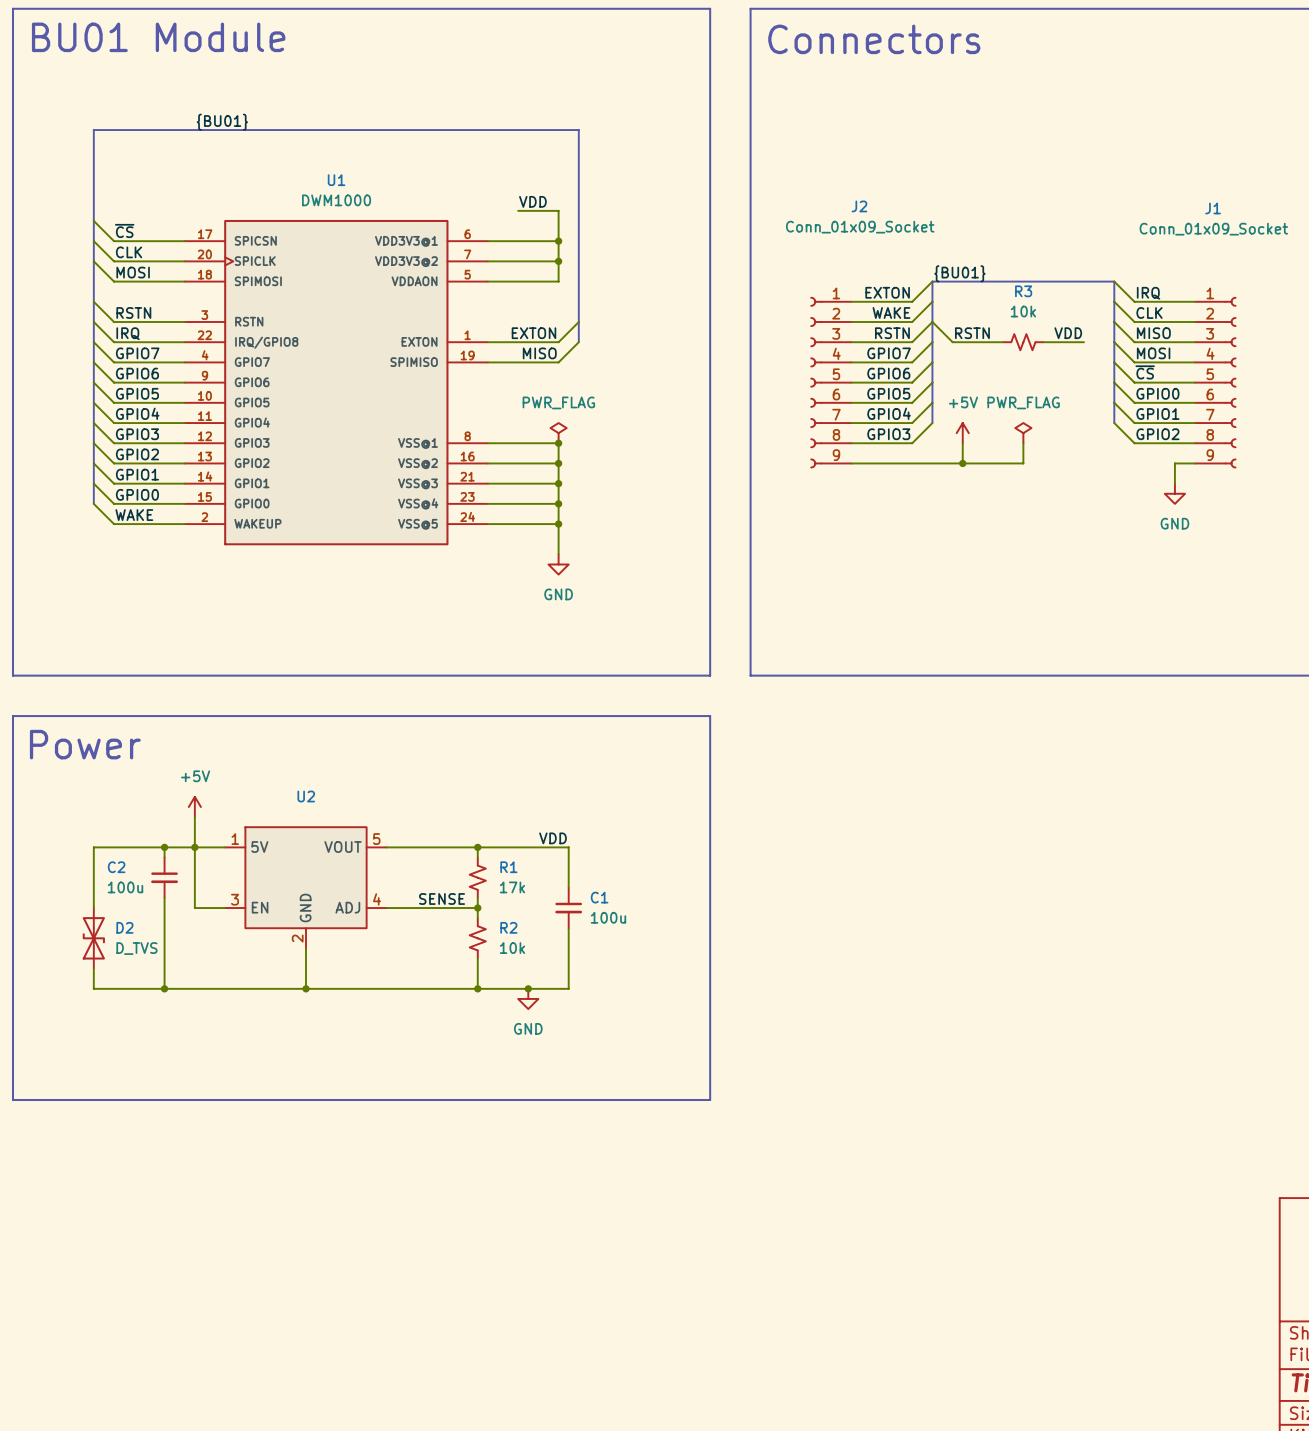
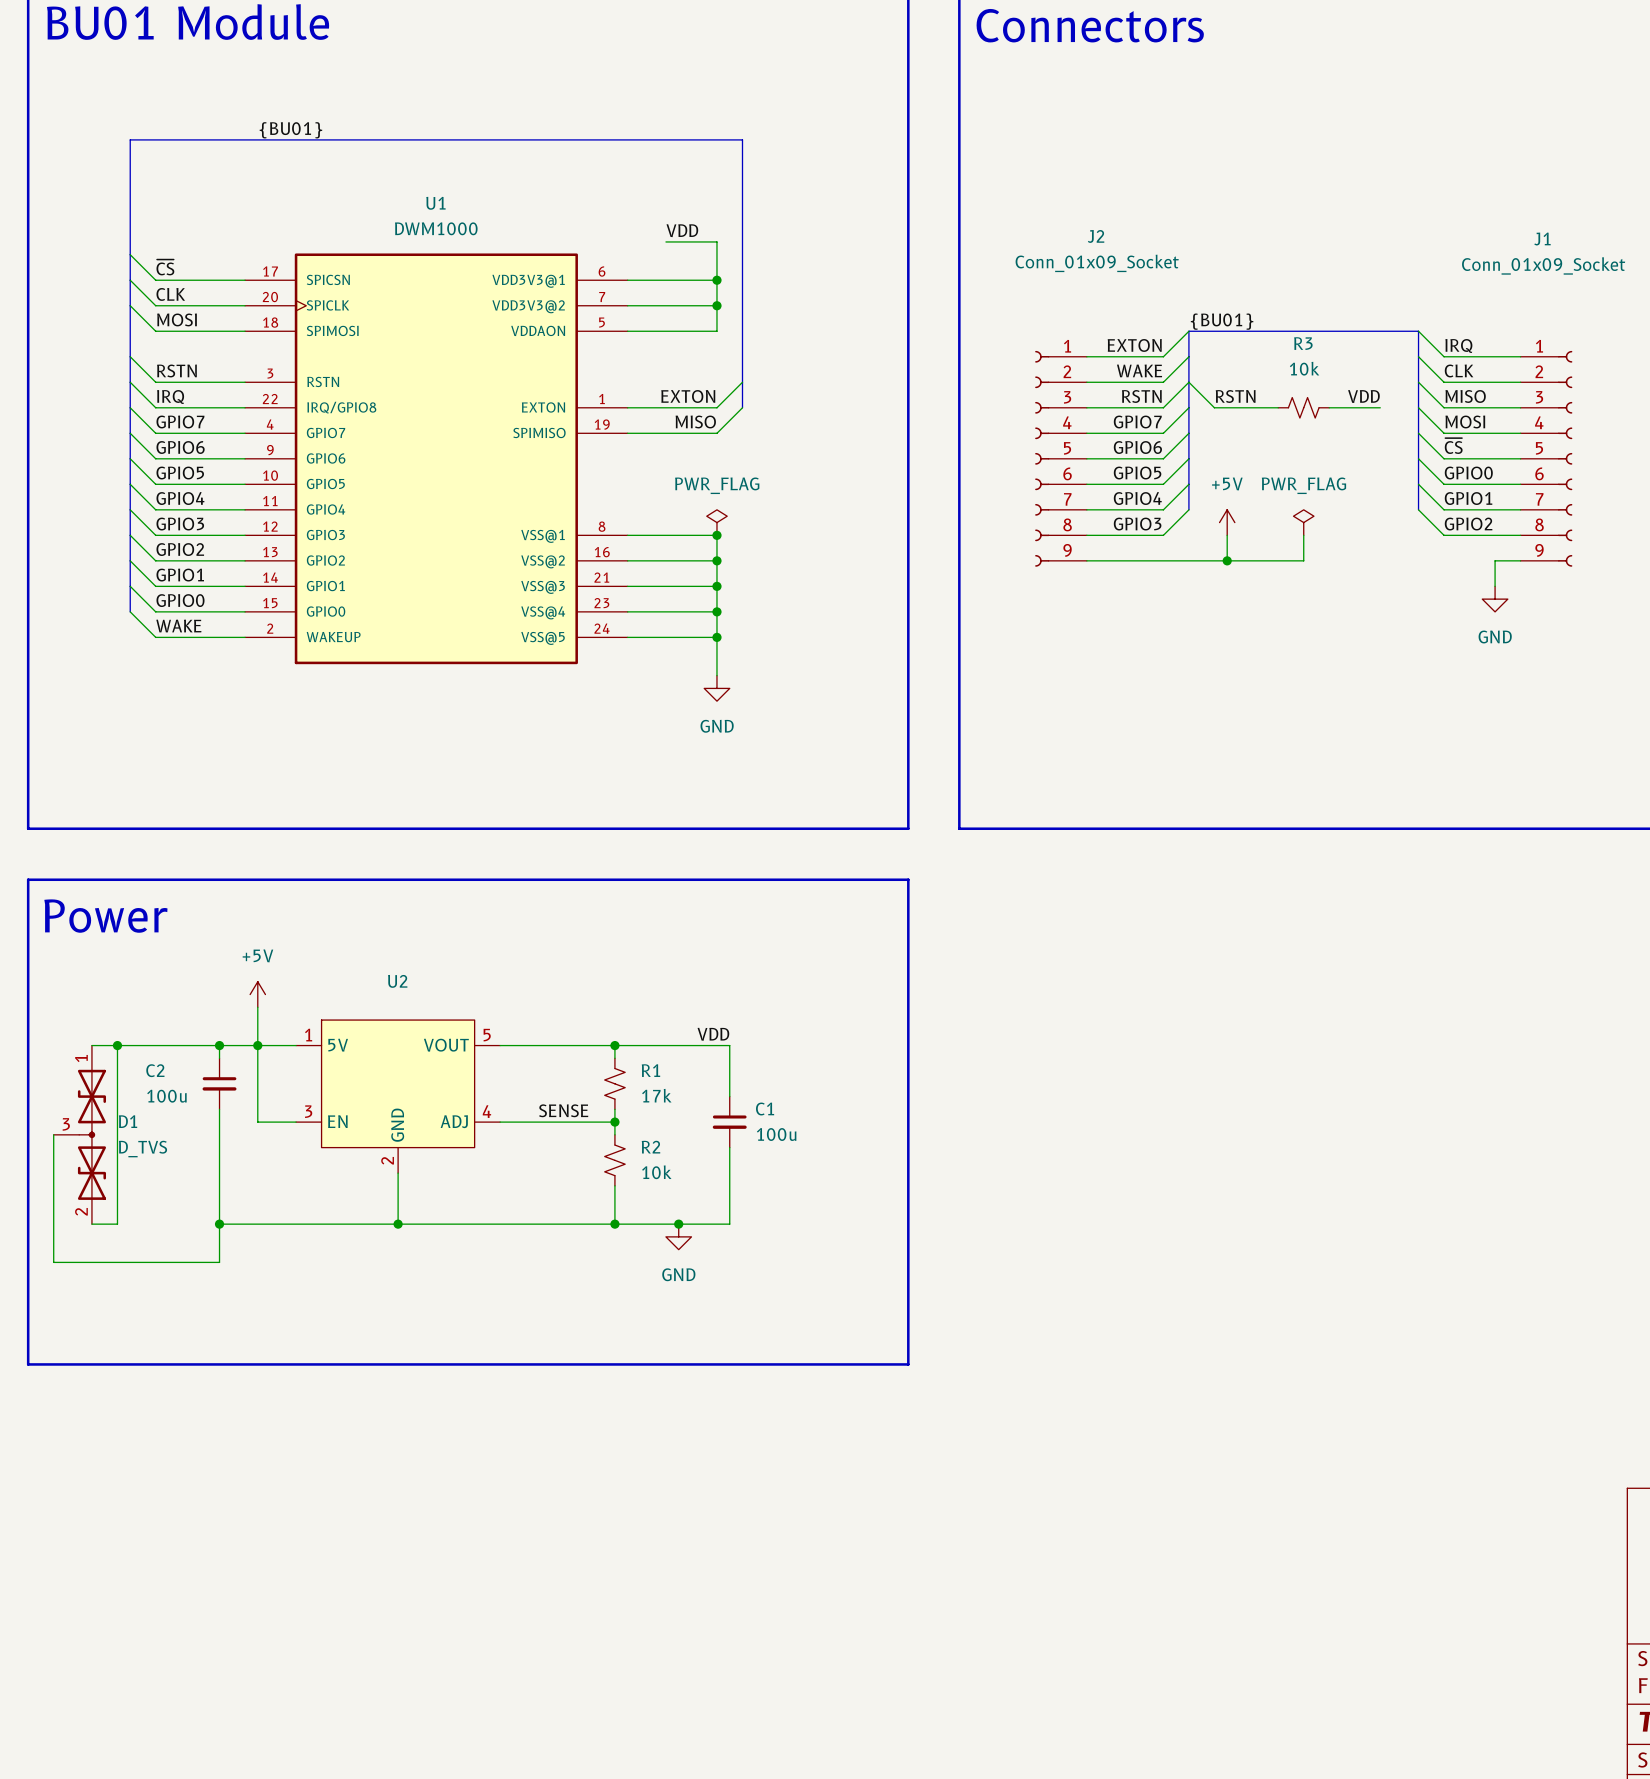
wire: none -> (117, 1045) (117, 1224) (91, 1224)
junction: none -> (117, 1045)
wire: (93, 847) (93, 908) -> (130, 1045) (91, 1045)
D1: none -> D_TVS (79, 1134)
D2: D_TVS (93, 938) -> none
wire: (93, 968) (93, 988) (164, 988) -> (53, 1134) (53, 1262) (219, 1262) (219, 1224)

